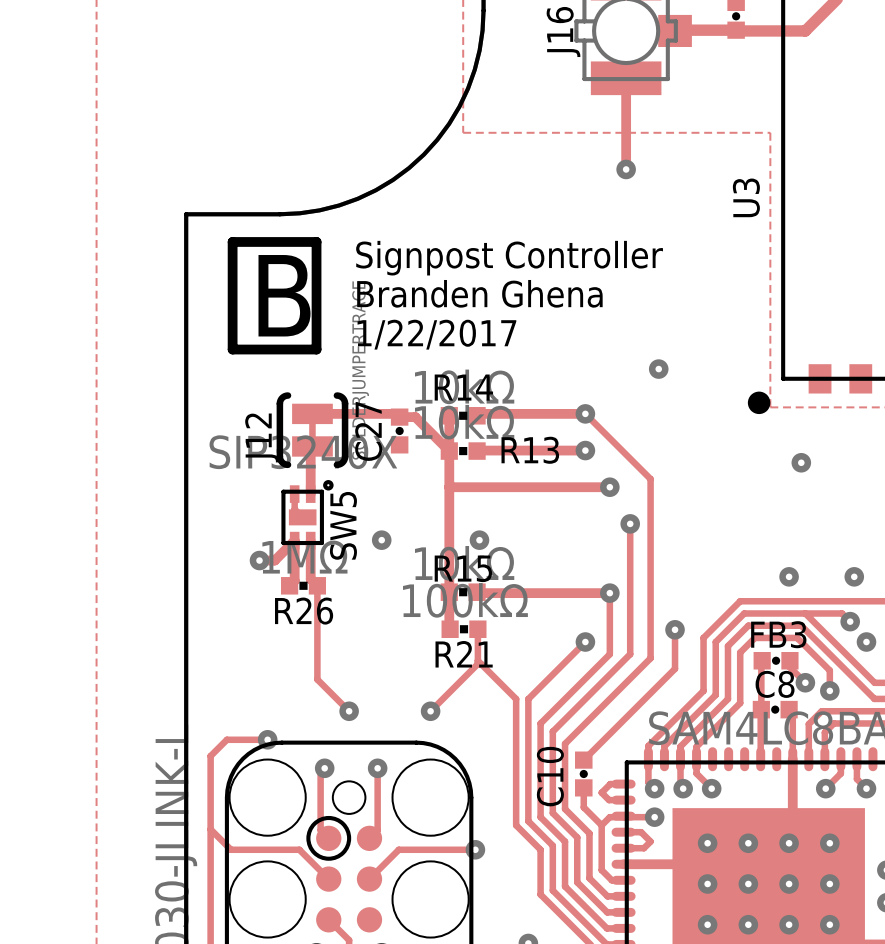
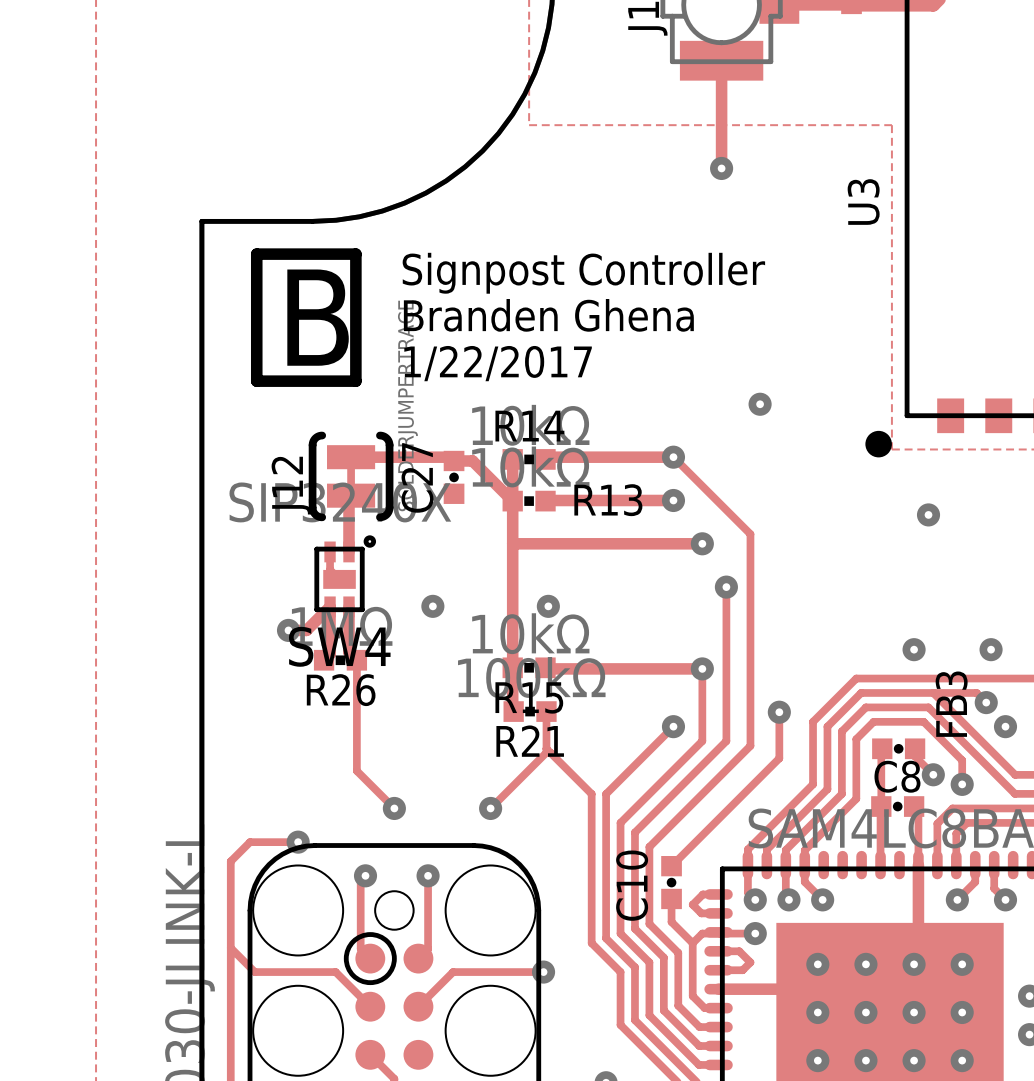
SW5 name: SW5 (343, 525) -> SW4 (339, 646)
R15 name position: R15 (463, 568) -> R15 (529, 697)
FB3 name rotation: 0° (778, 634) -> 90° counterclockwise (951, 704)

